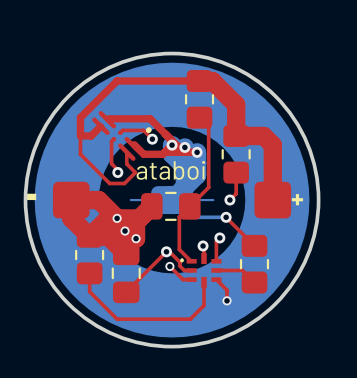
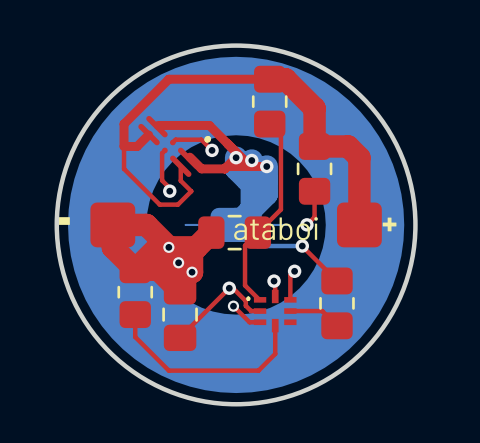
text position: ataboi (170, 170) -> ataboi (276, 228)
top track: (216, 279) (227, 290) (227, 300) -> none
via: (227, 300) -> none

